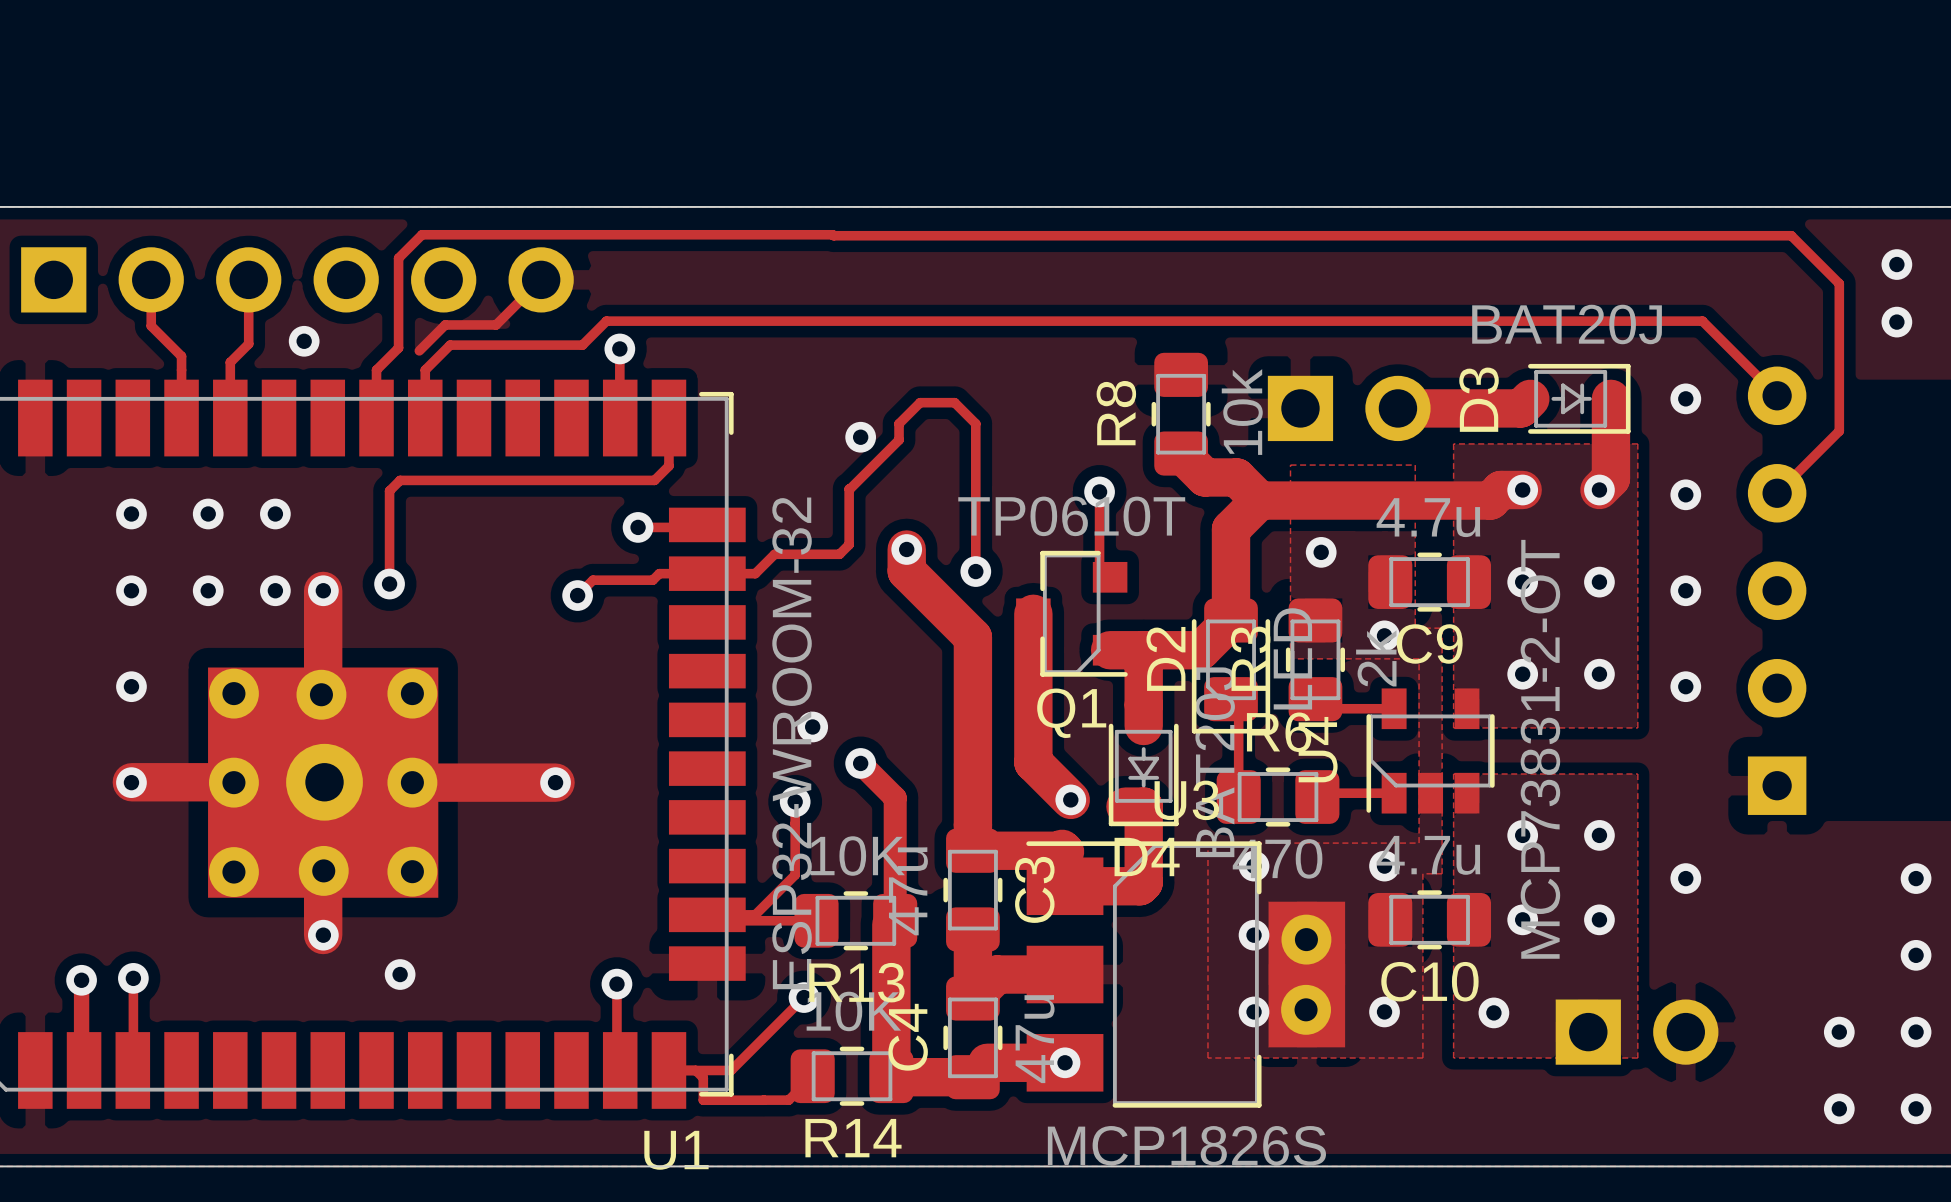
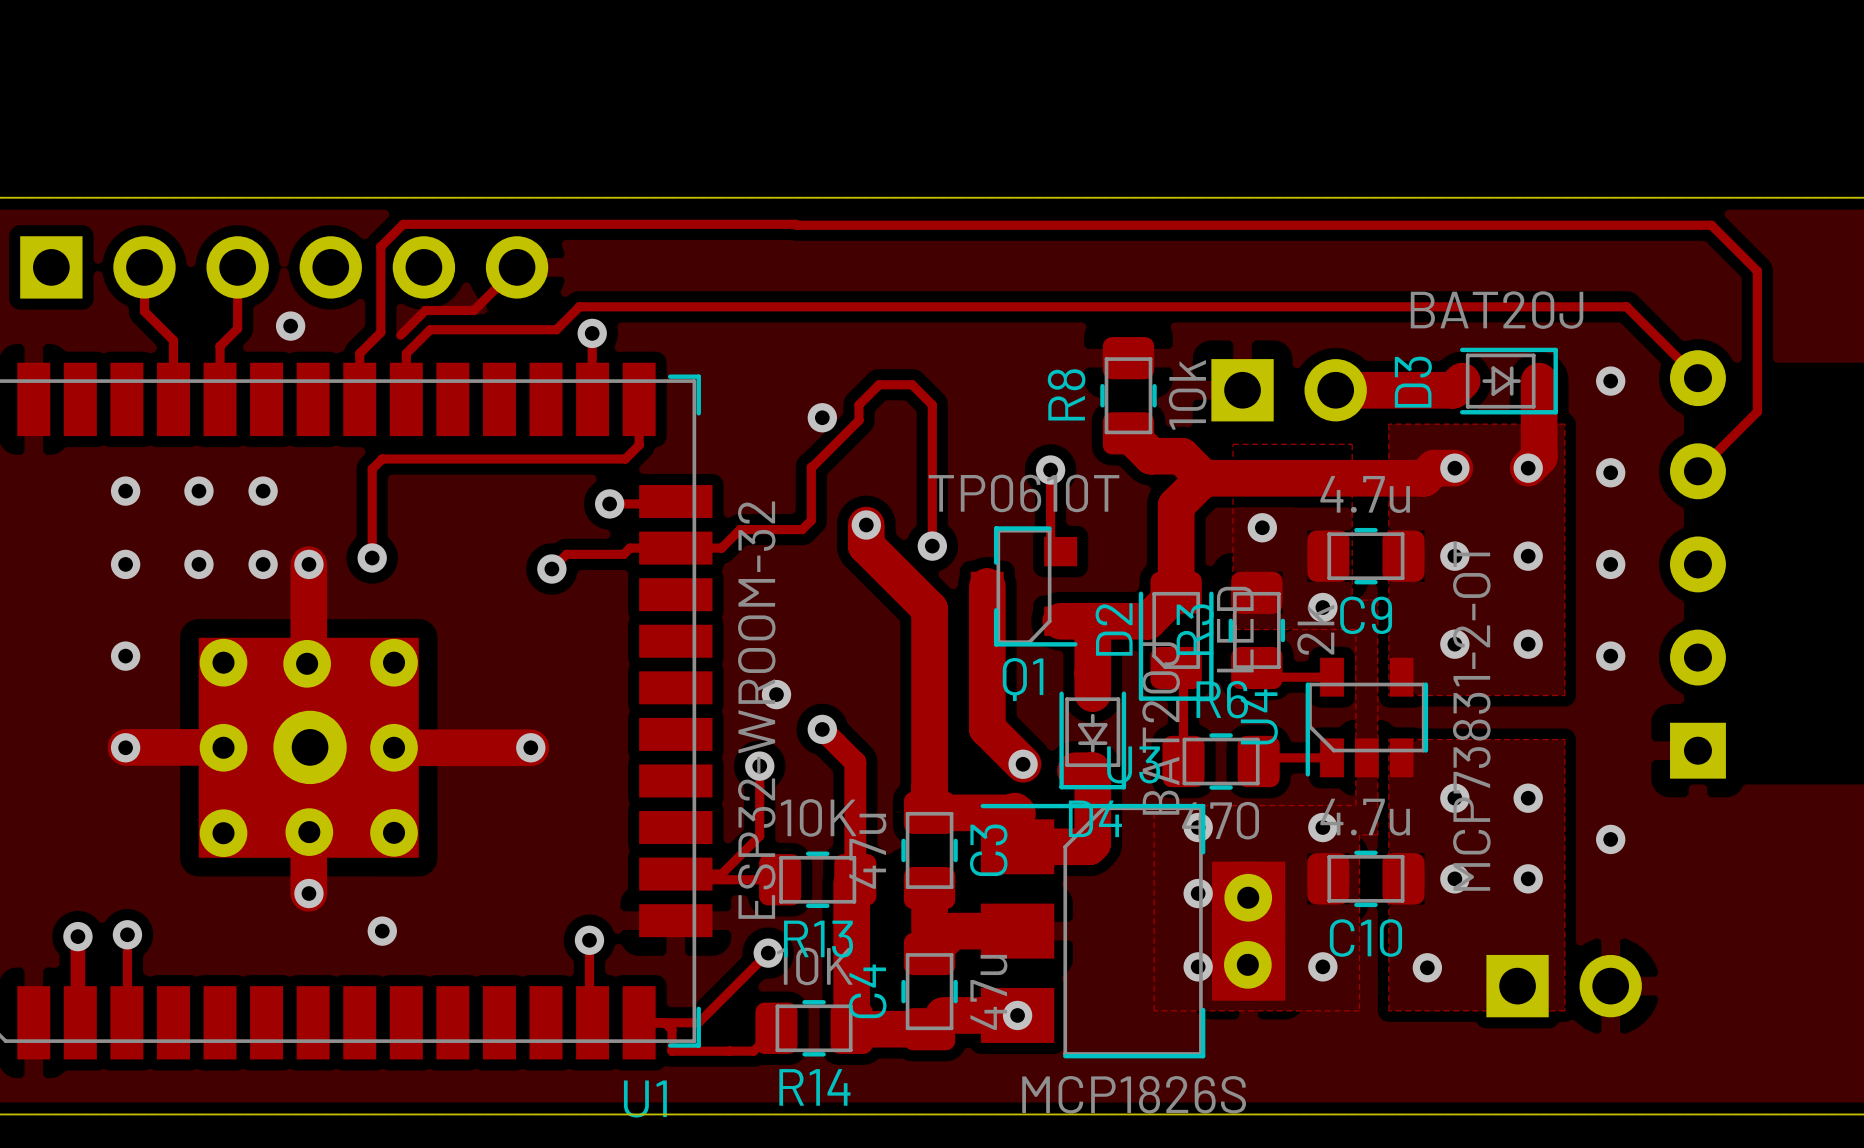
via: (1896, 264) -> none
via: (1896, 322) -> none
via: (1916, 878) -> none
via: (1916, 955) -> none
via: (1839, 1032) -> none
via: (1916, 1032) -> none
via: (1839, 1108) -> none
via: (1916, 1108) -> none

